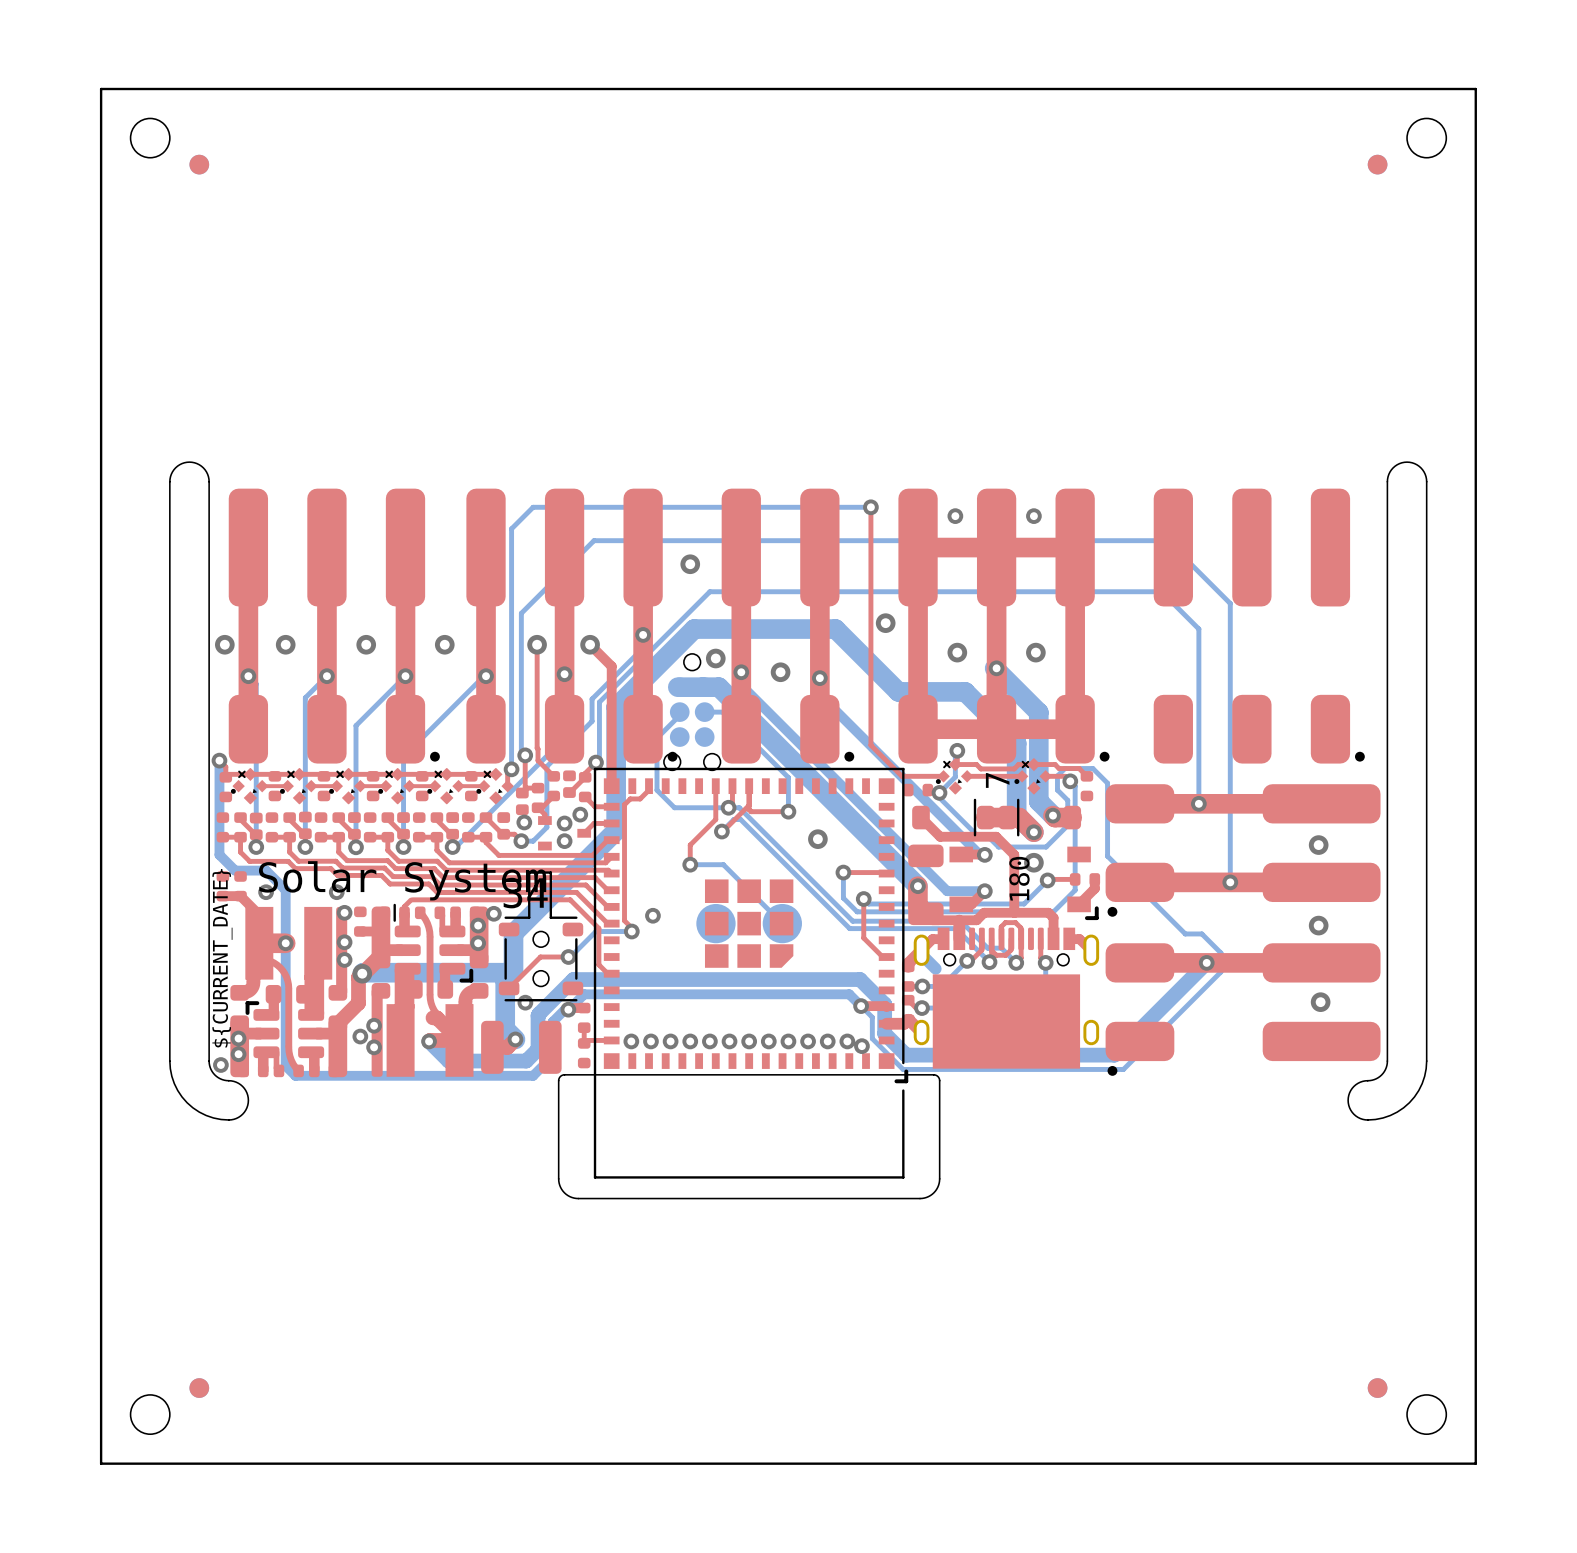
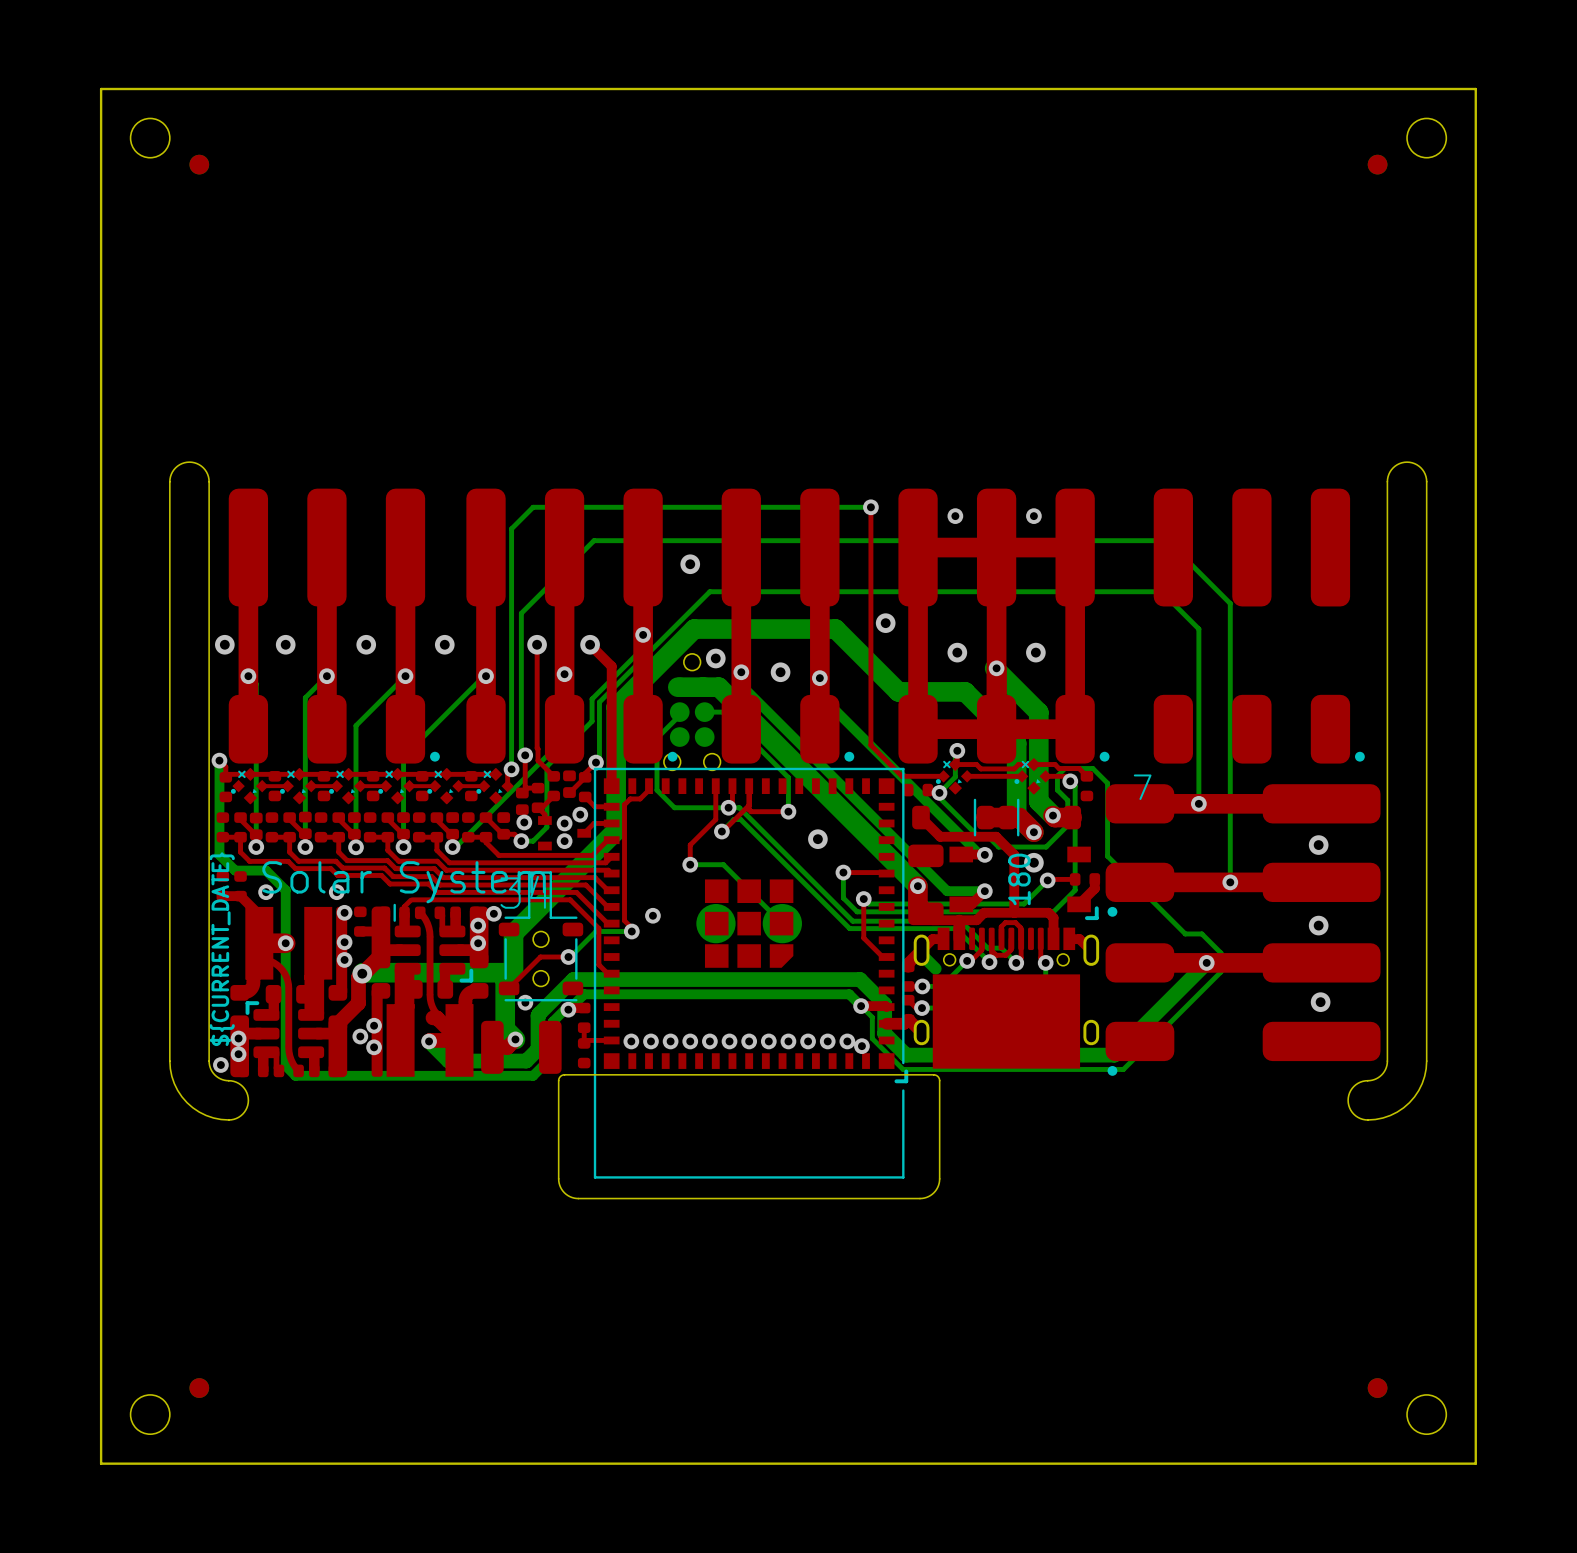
text rotation: 0° (997, 780) -> 90° clockwise (1142, 787)
text position: 7 (997, 780) -> 7 (1142, 787)

